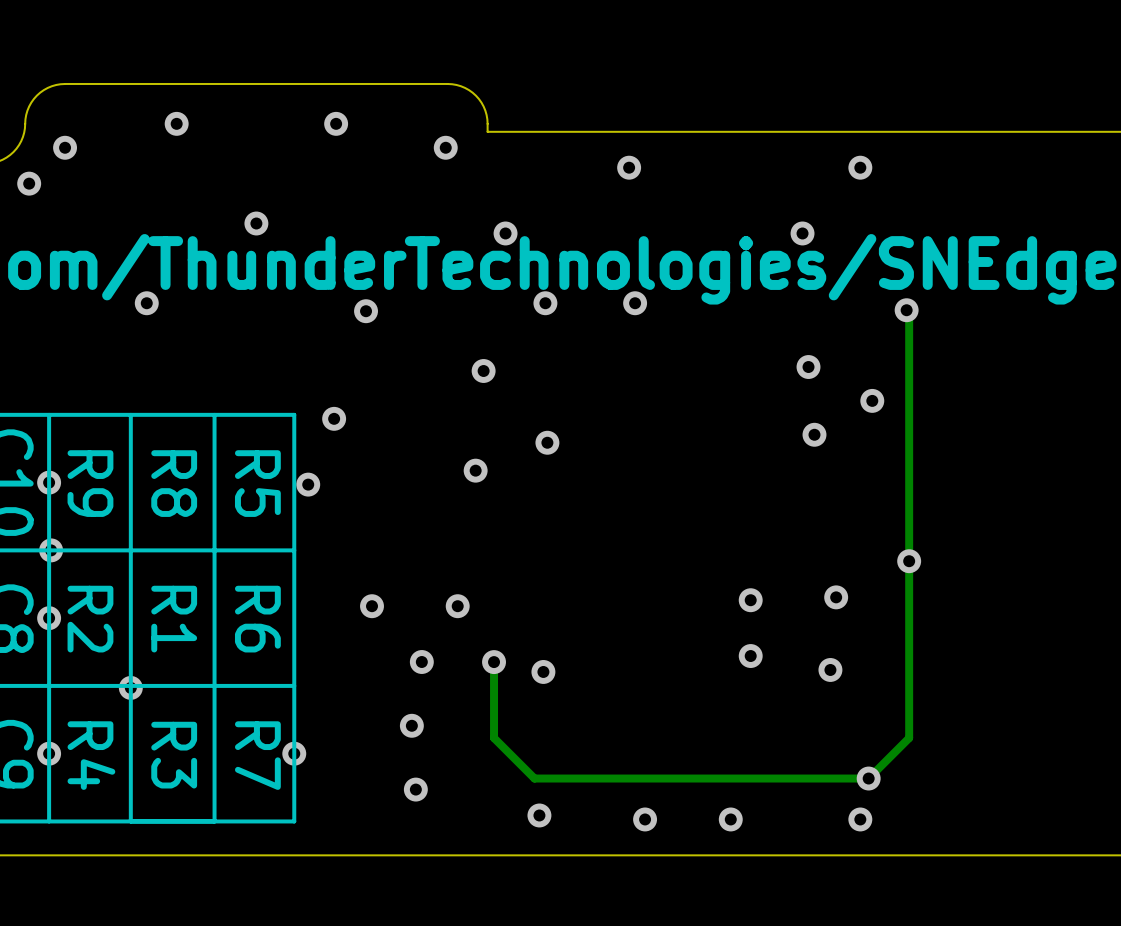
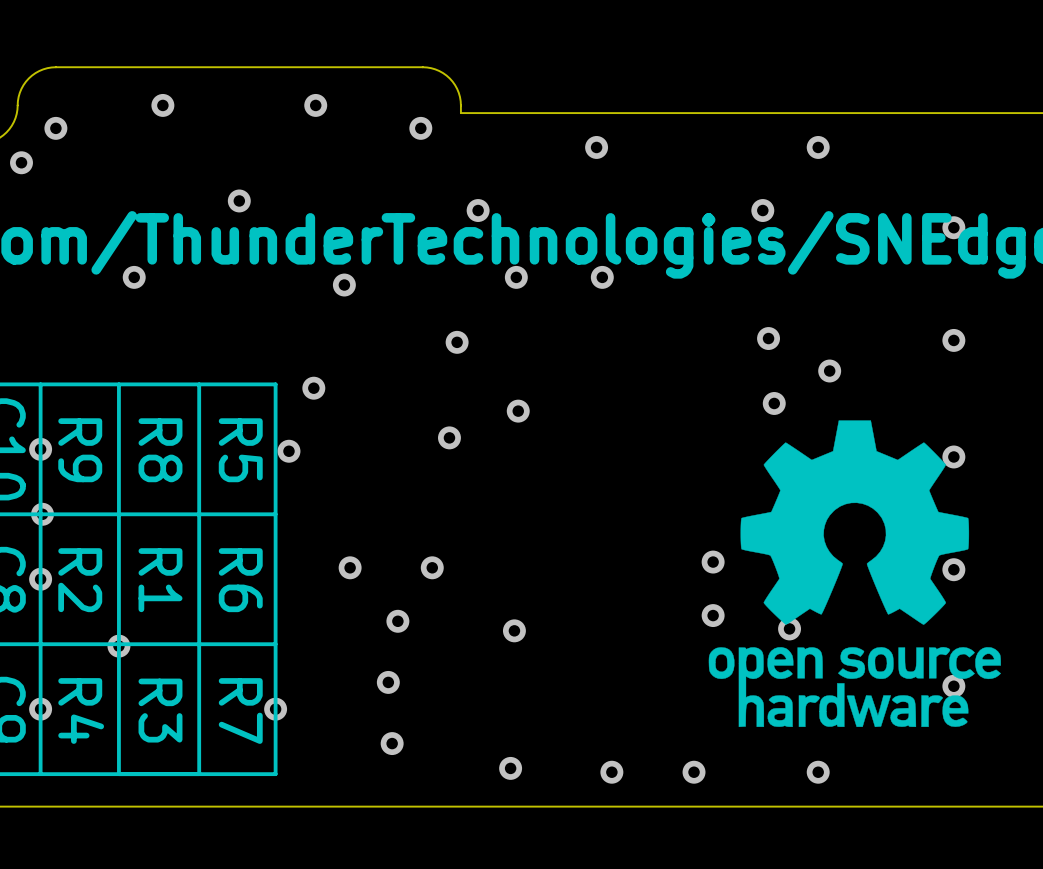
via: none -> (953, 227)
track: (906, 310) (909, 312) (909, 738) (868, 778) (534, 778) (494, 738) (494, 662) -> none
via: (906, 310) -> none
via: none -> (953, 340)
drawing: none -> [708, 420, 1001, 728]
via: none -> (953, 456)
via: (909, 561) -> none
via: none -> (953, 569)
via: (494, 662) -> none
via: none -> (953, 686)
via: (868, 778) -> none

